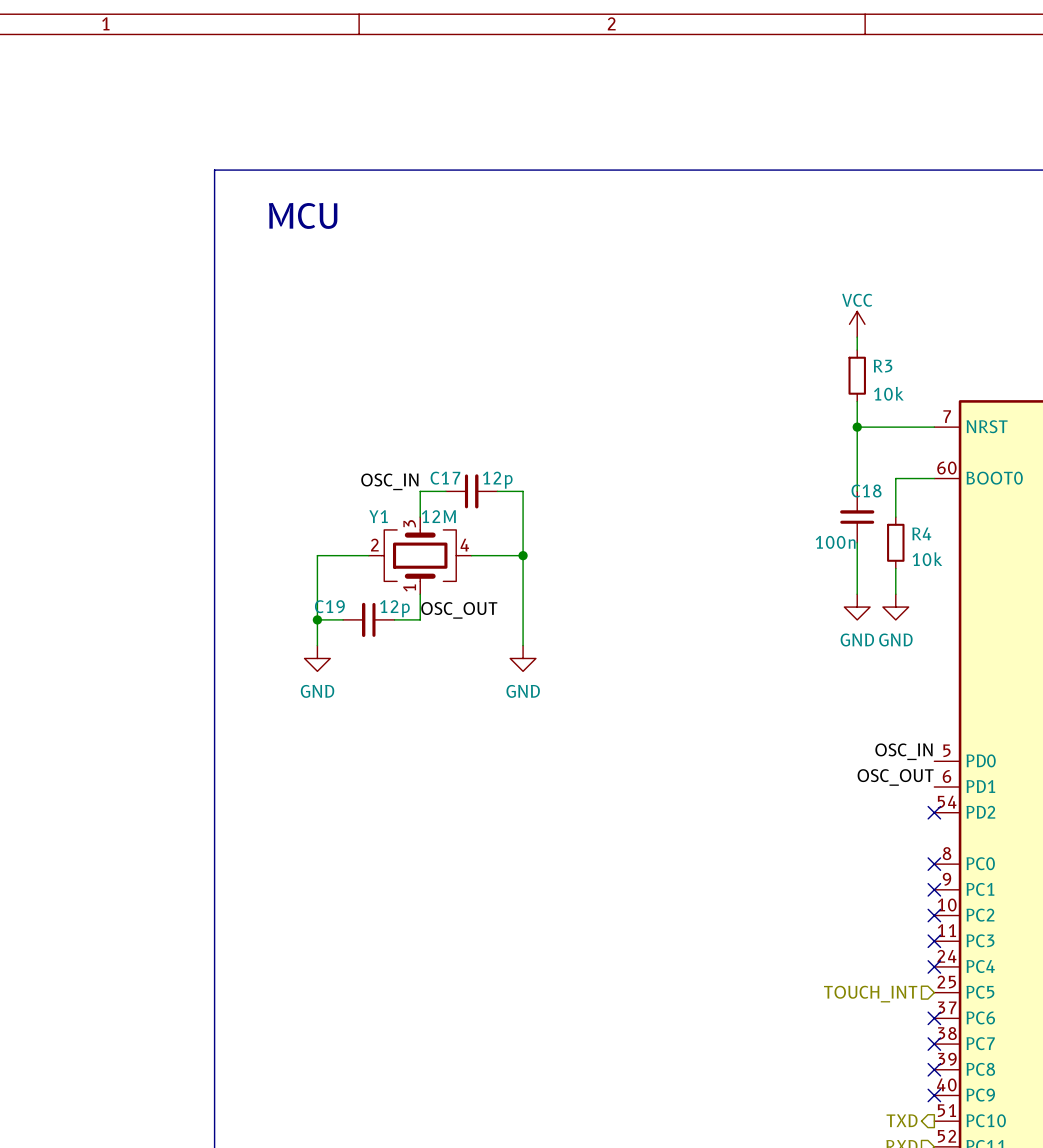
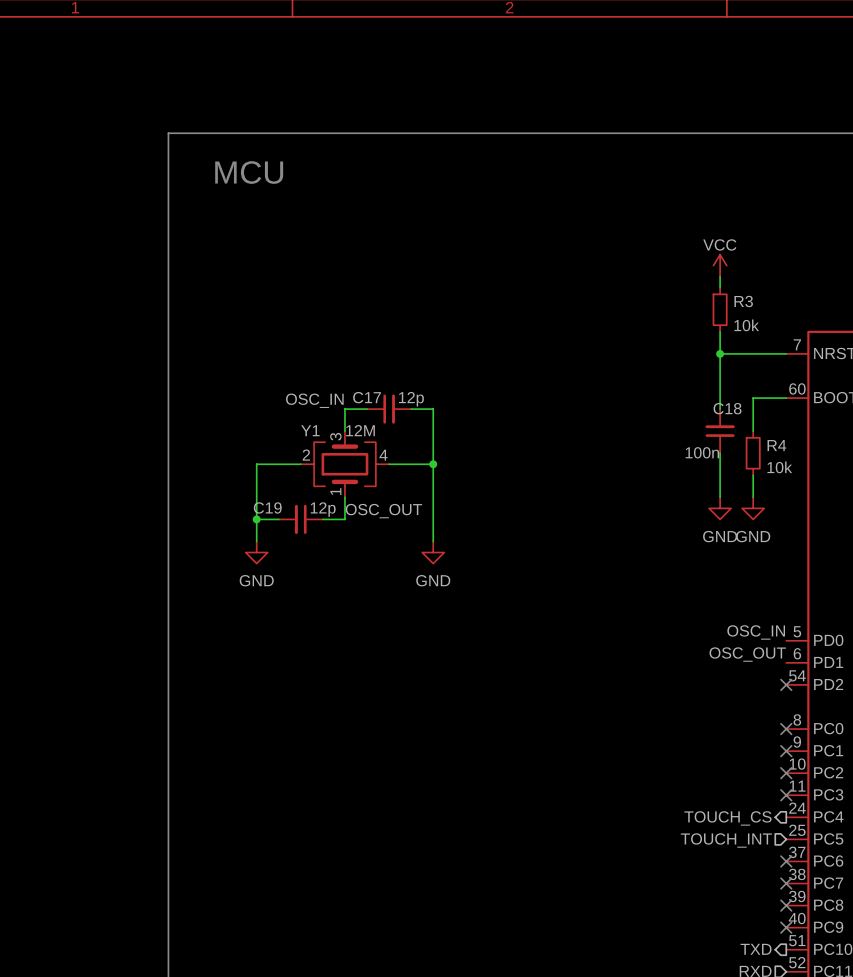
no-connect mark: (934, 966) -> none
hierarchical label: none -> TOUCH_CS (727, 818)

